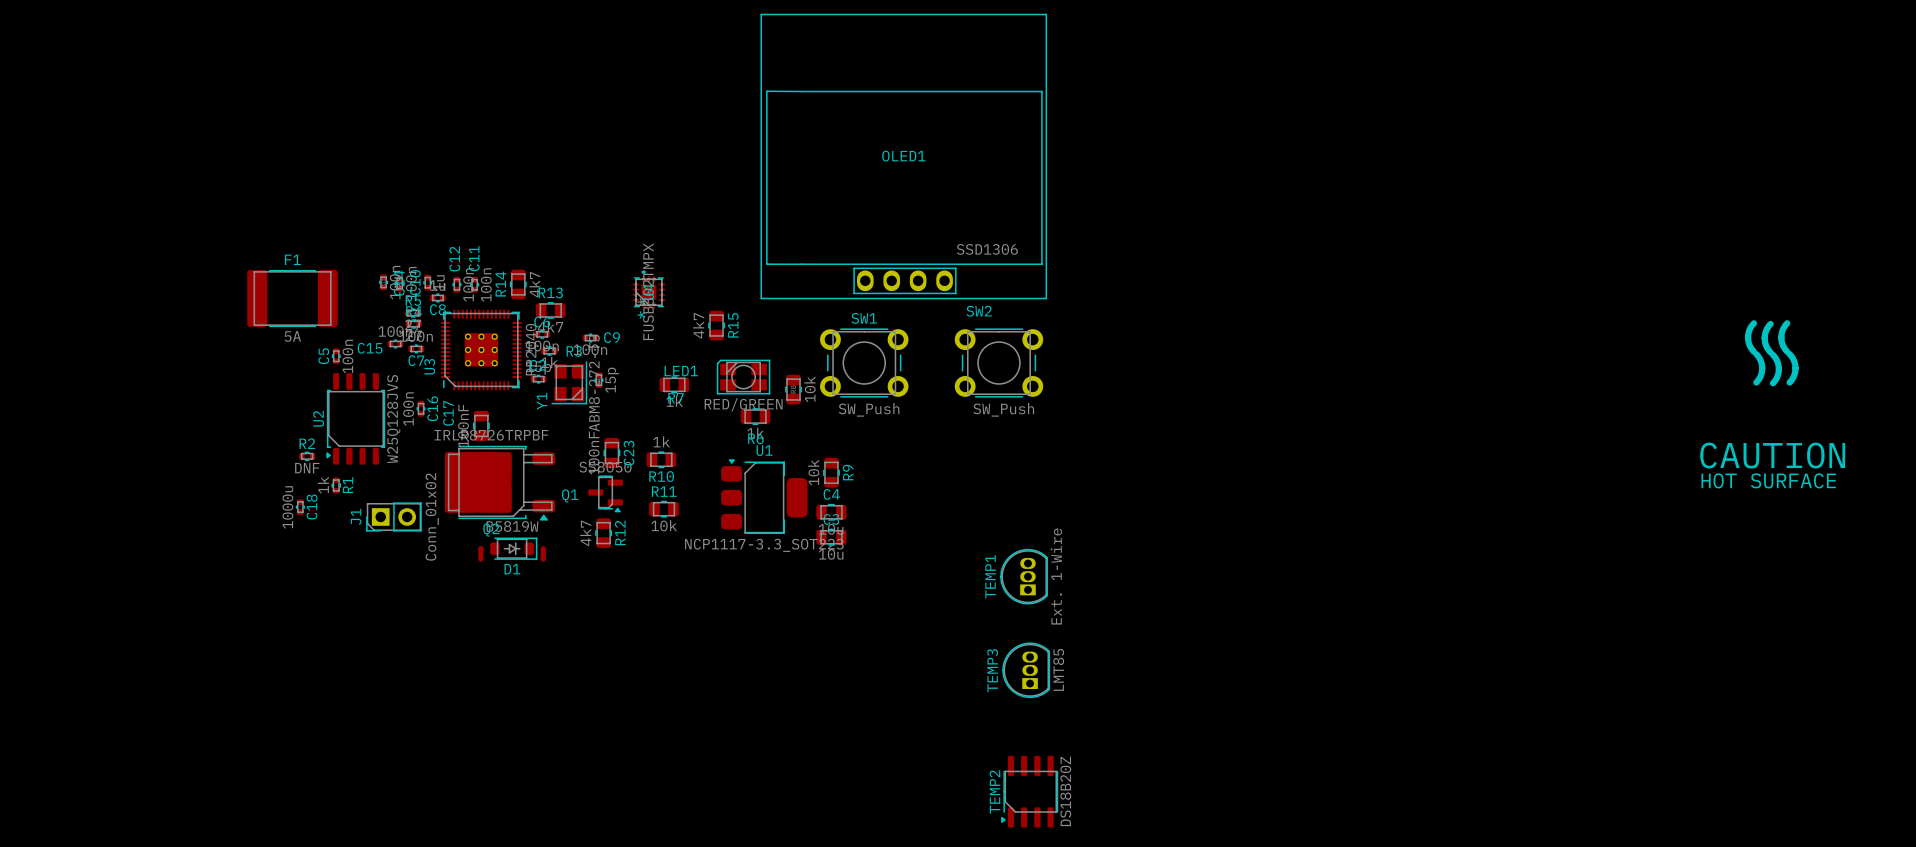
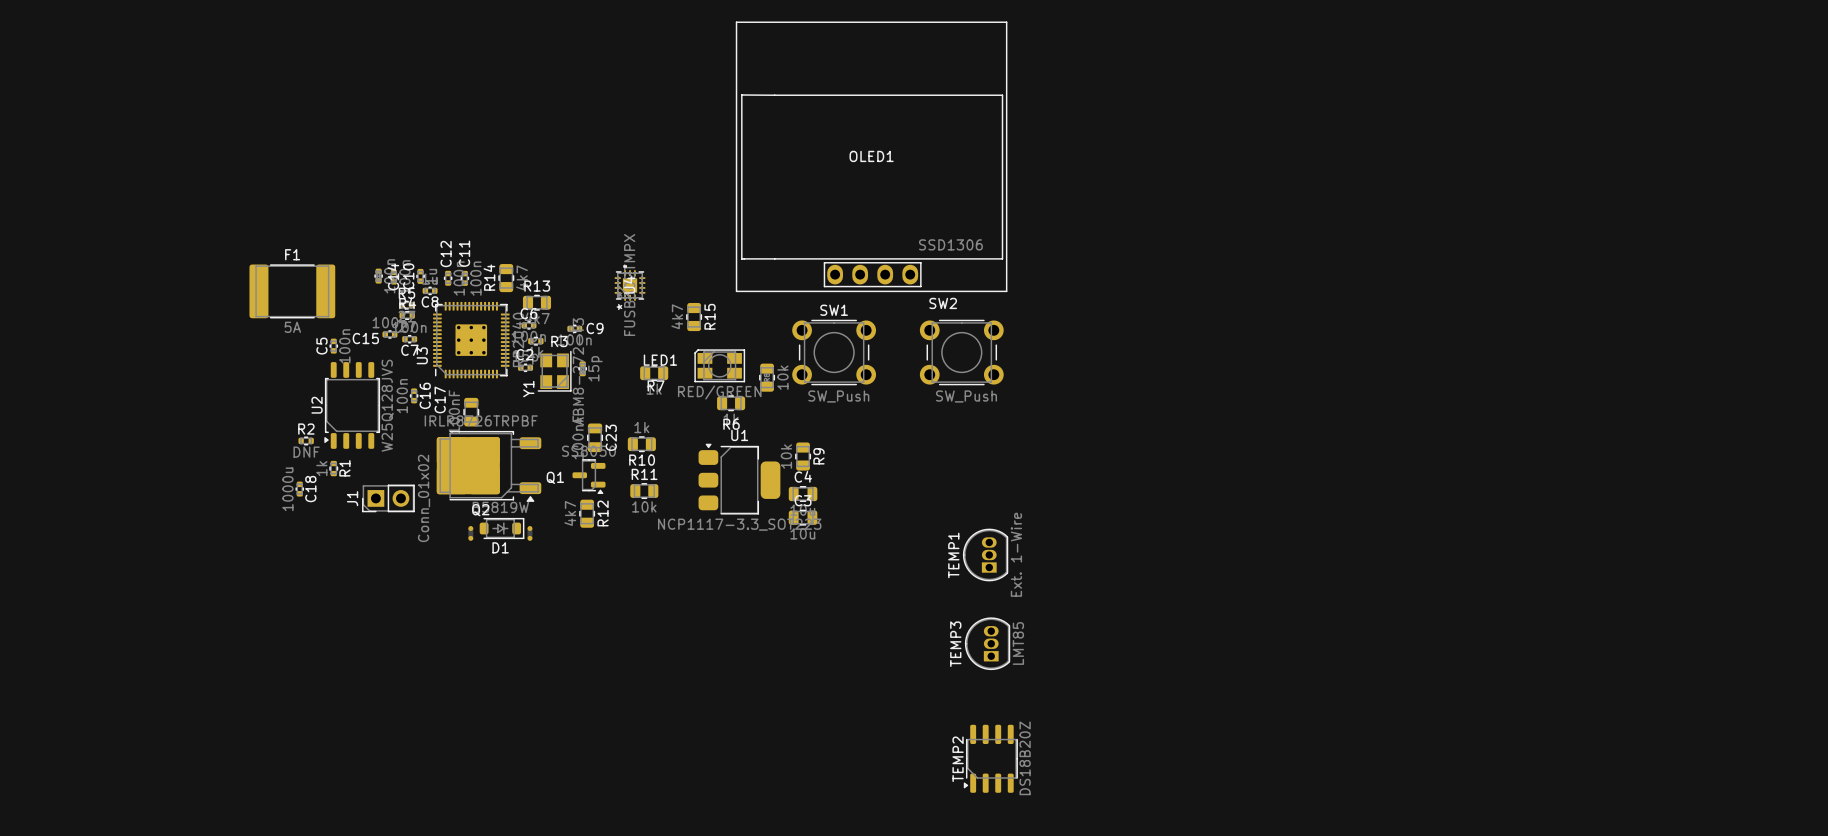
line: (1753, 323) (1749, 329) (1748, 337) (1749, 345) (1753, 351) -> none
line: (1787, 323) (1782, 329) (1781, 337) (1782, 345) (1787, 351) -> none
line: (1770, 324) (1766, 330) (1764, 338) (1766, 345) (1770, 352) -> none
line: (1756, 354) (1760, 360) (1762, 368) (1760, 376) (1756, 382) -> none
line: (1773, 354) (1777, 361) (1778, 369) (1777, 376) (1773, 383) -> none
line: (1789, 354) (1794, 360) (1795, 368) (1794, 376) (1789, 382) -> none
text: CAUTION (1772, 455) -> none
text: HOT SURFACE (1768, 480) -> none

